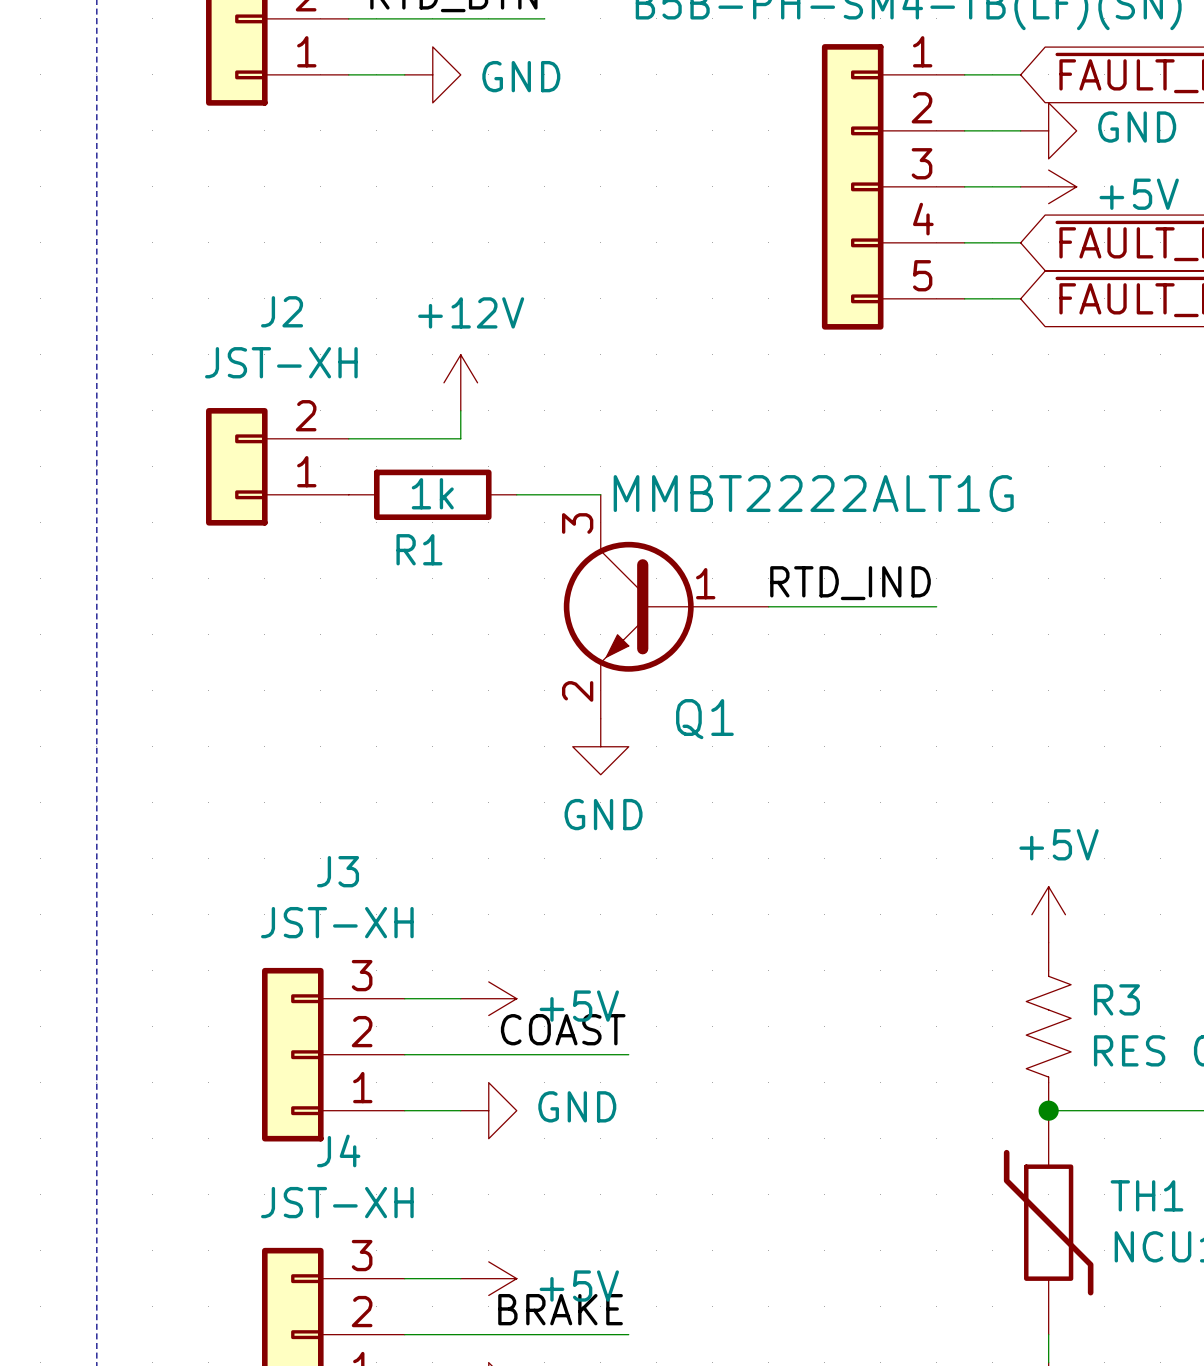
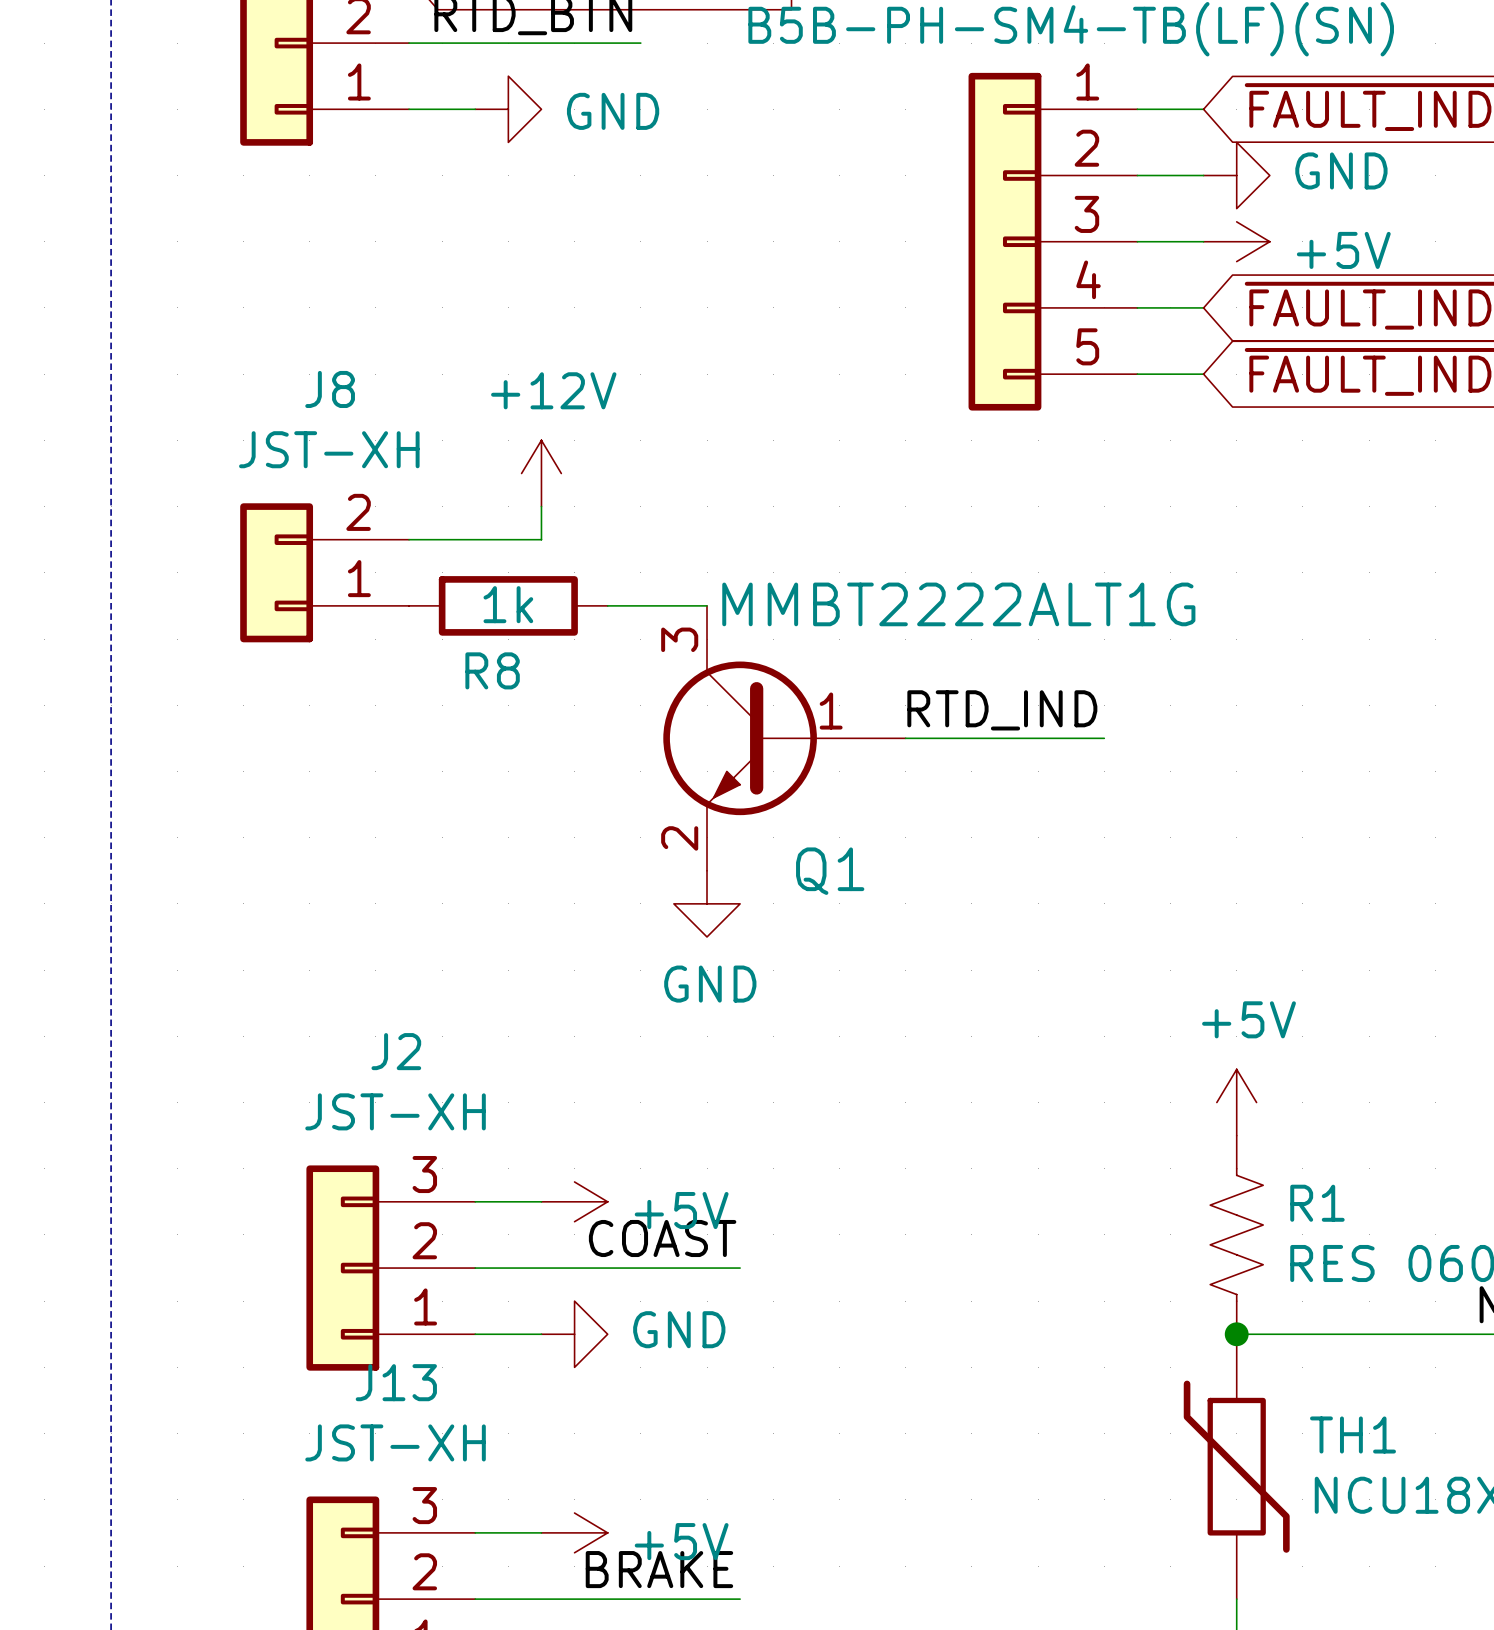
J2 name: J2 (282, 311) -> J8 (330, 389)
R1 name: R1 (419, 549) -> R8 (492, 670)
J3 name: J3 (338, 871) -> J2 (396, 1051)
R3 name: R3 (1116, 999) -> R1 (1317, 1203)
J4 name: J4 (338, 1150) -> J13 (396, 1382)

